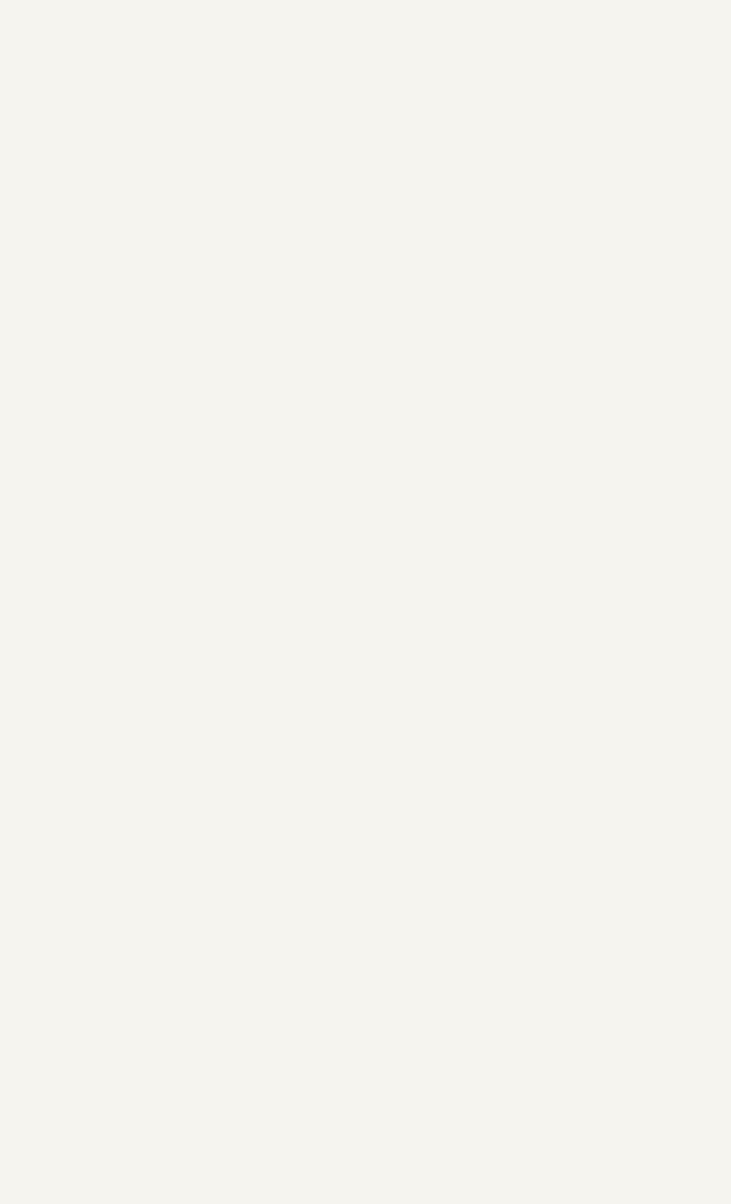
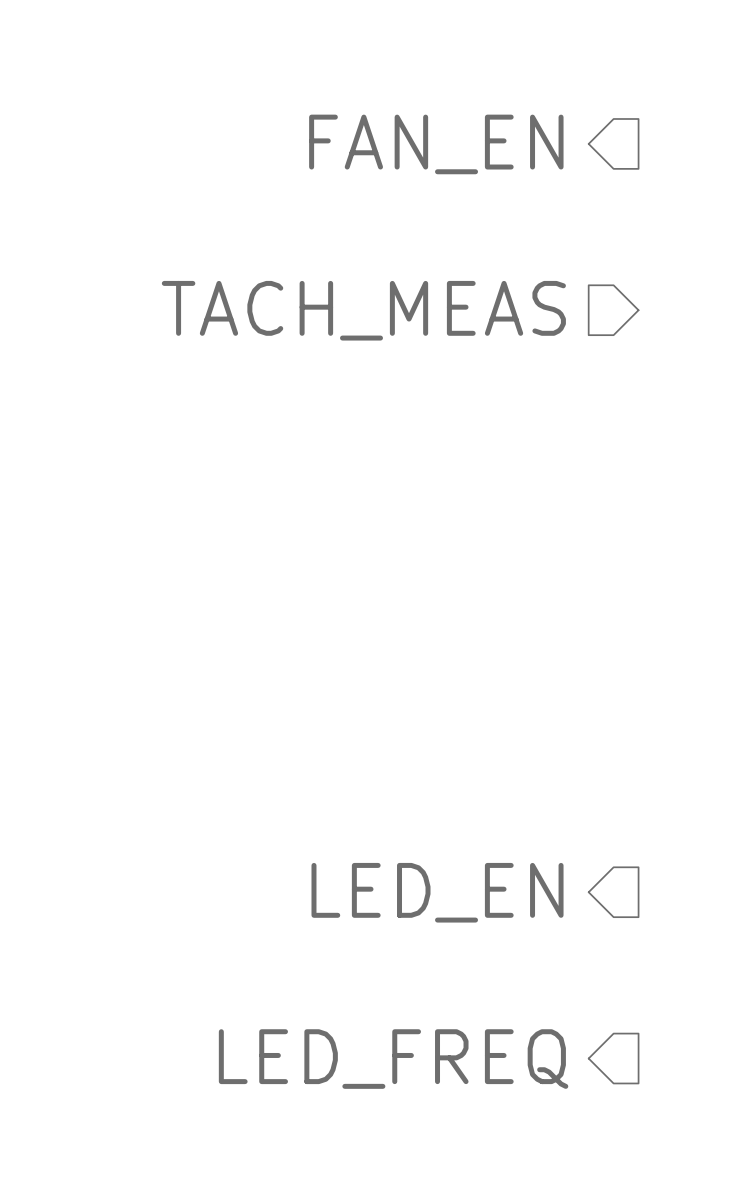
hierarchical label: none -> FAN_EN (436, 144)
hierarchical label: none -> TACH_MEAS (363, 310)
hierarchical label: none -> LED_EN (437, 892)
hierarchical label: none -> LED_FREQ (393, 1059)

